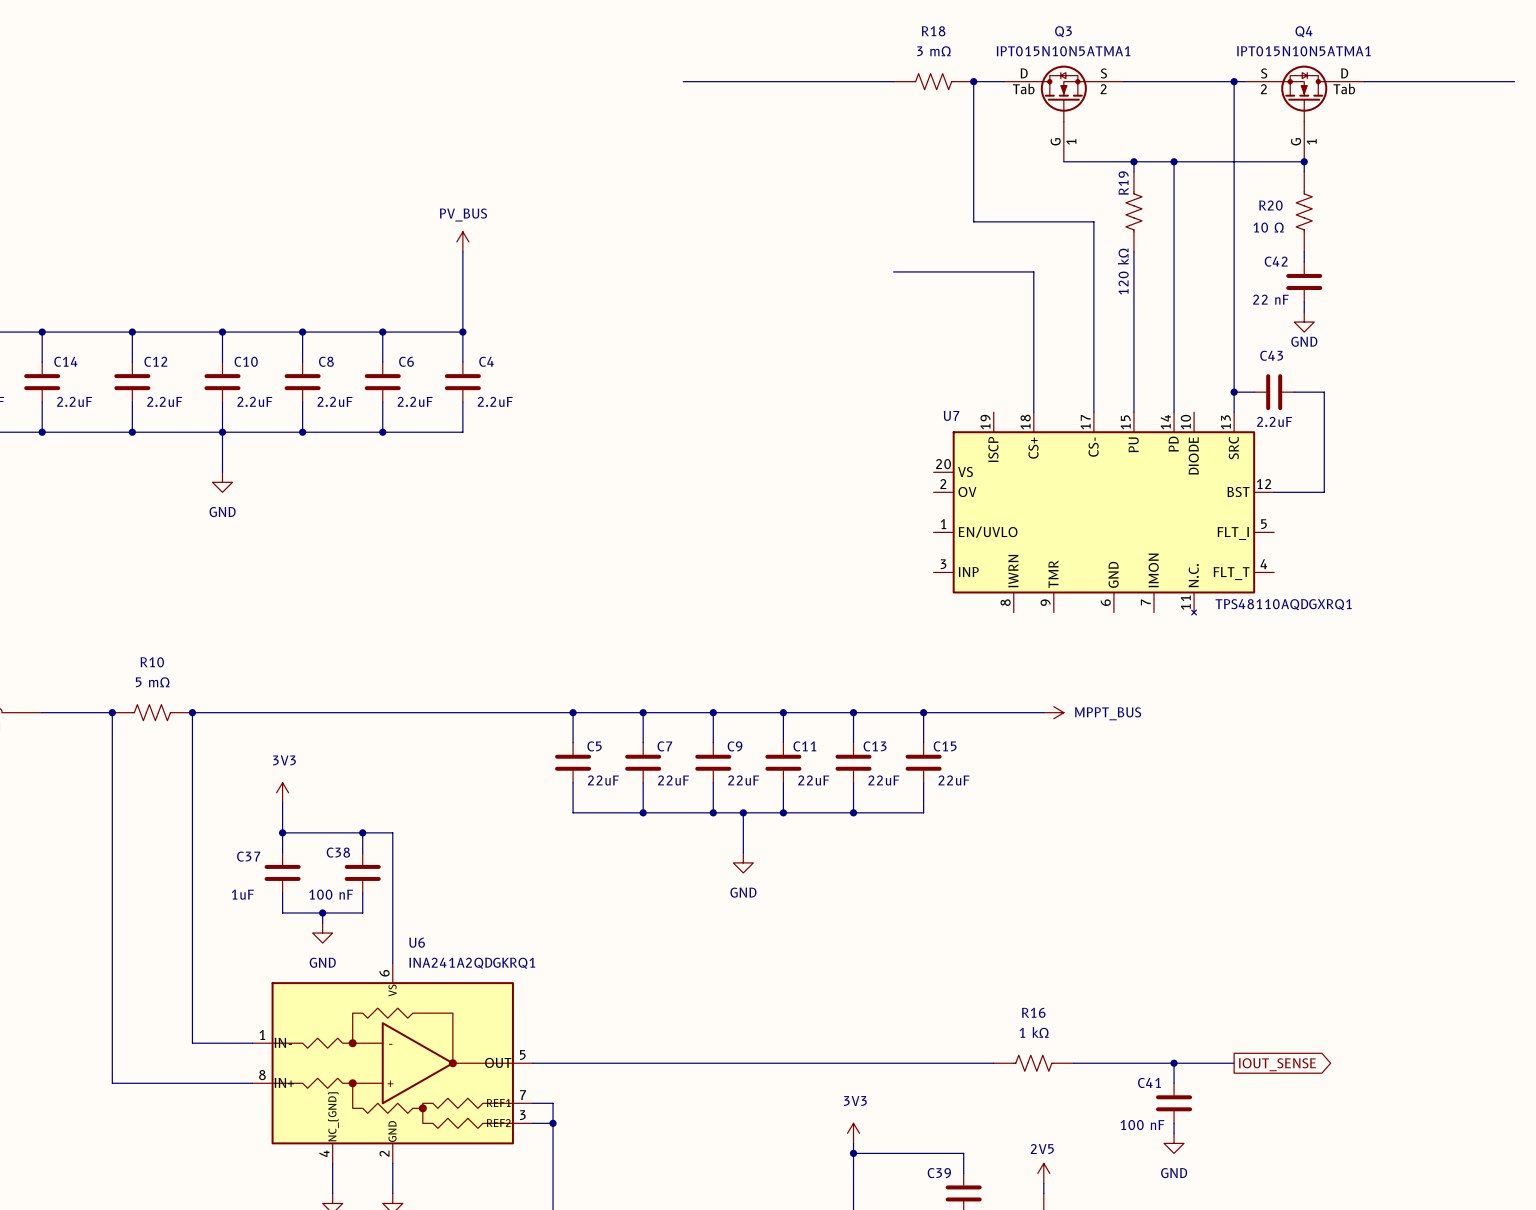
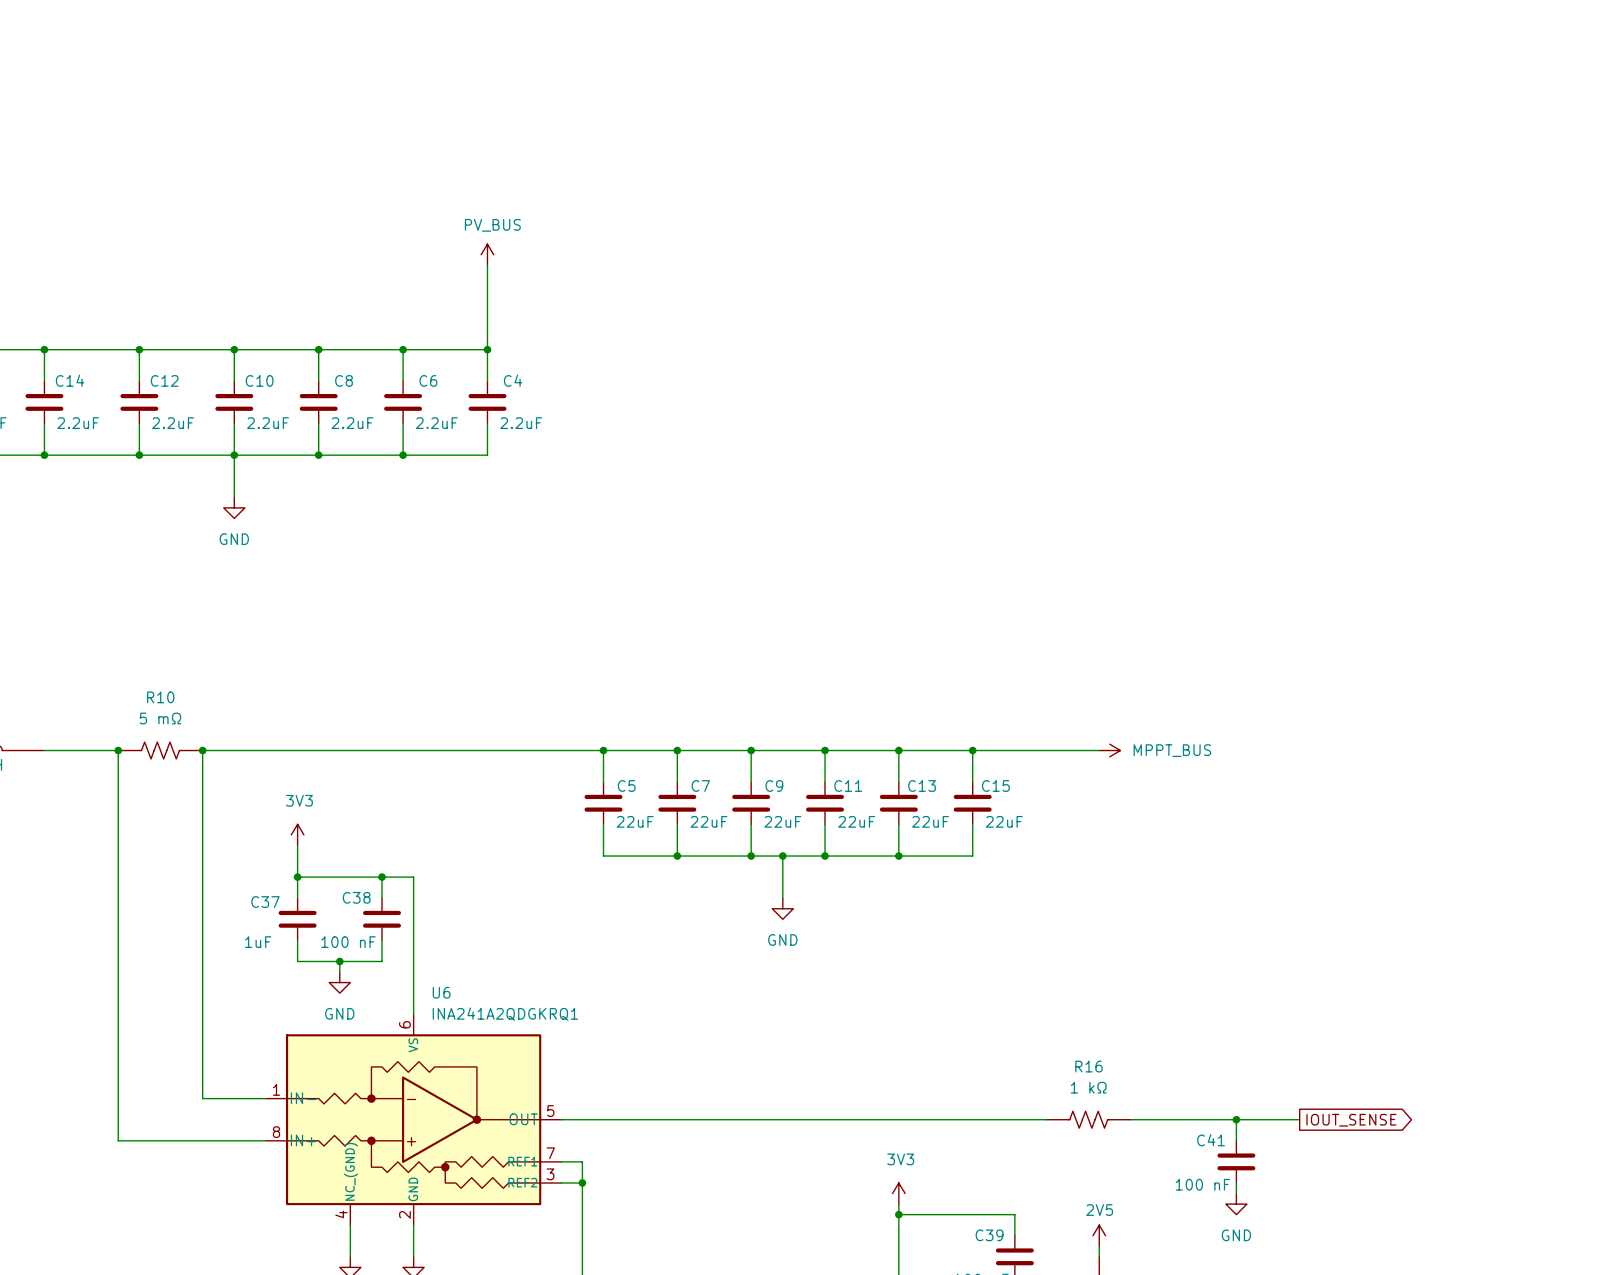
wire: (683, 81) (893, 81) -> none
R18: 3 mΩ (933, 81) -> none
junction: (973, 81) -> none
wire: (1003, 81) (973, 81) (973, 221) (1093, 221) (1093, 412) -> none
wire: (1123, 81) (1244, 81) -> none
wire: (1234, 81) (1234, 412) -> none
junction: (1234, 81) -> none
wire: (1364, 81) (1514, 81) -> none
Q3: IPT015N10N5ATMA1 (1063, 113) -> none
Q4: IPT015N10N5ATMA1 (1304, 113) -> none
wire: (1063, 161) (1304, 161) (1304, 171) -> none
wire: (1133, 161) (1133, 171) -> none
junction: (1133, 161) -> none
wire: (1174, 161) (1174, 412) -> none
junction: (1174, 161) -> none
junction: (1304, 161) -> none
R19: 120 kΩ (1133, 211) -> none
R20: 10 Ω (1304, 211) -> none
wire: (1133, 251) (1133, 412) -> none
wire: (1304, 251) (1304, 261) -> none
wire: (893, 271) (1033, 271) (1033, 412) -> none
C42: 22 nF (1304, 281) -> none
wire: (1304, 302) (1304, 312) -> none
power symbol: GND (1304, 322) -> none
wire: (1234, 392) (1254, 392) -> none
junction: (1234, 392) -> none
C43: 2.2uF (1274, 392) -> none
wire: (1294, 392) (1324, 392) (1324, 492) (1274, 492) -> none
U7: TPS48110AQDGXRQ1 (1103, 513) -> none

